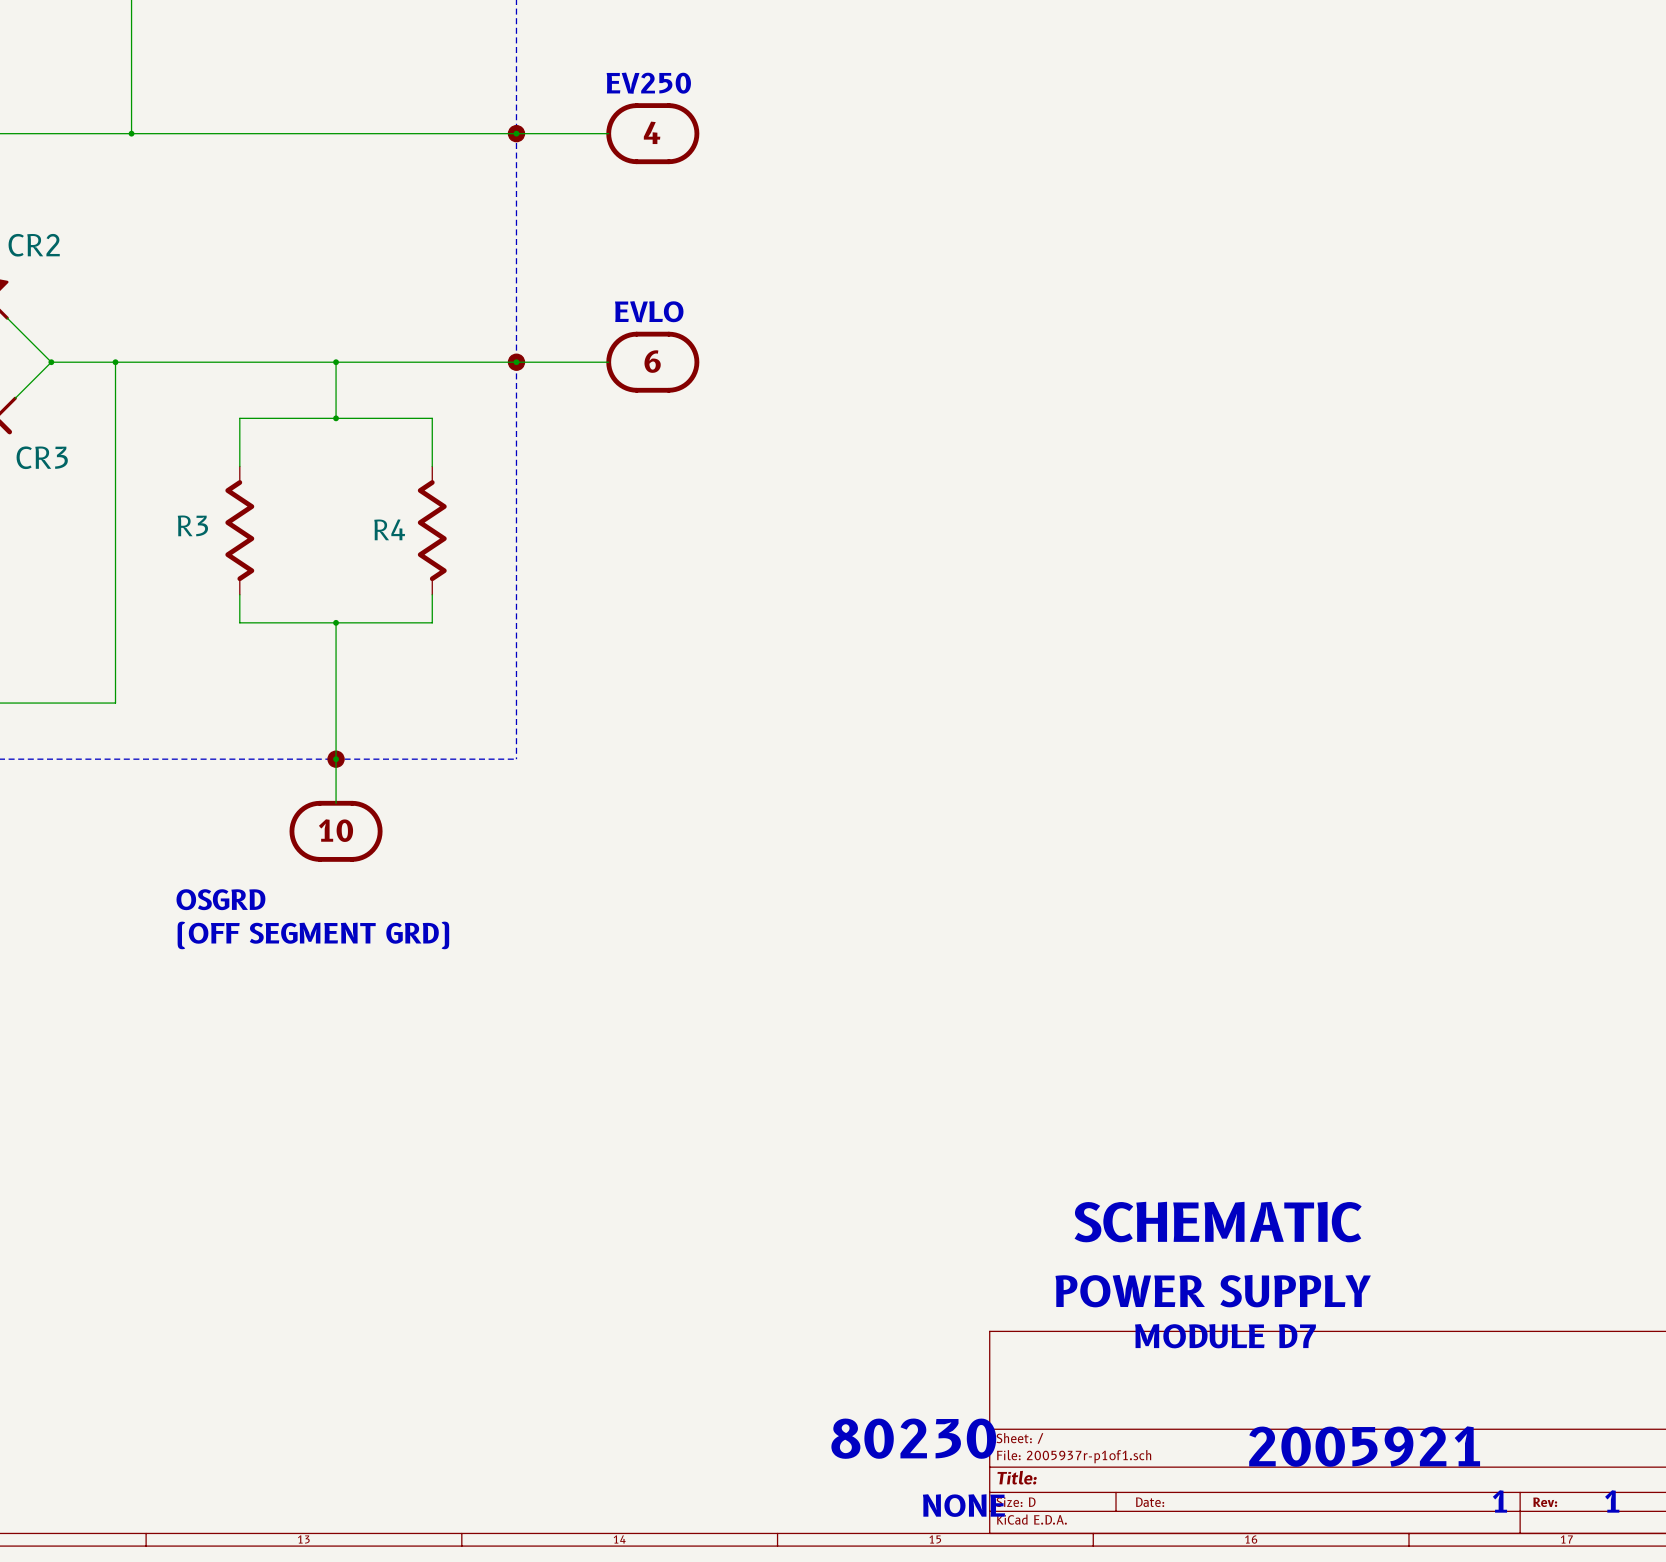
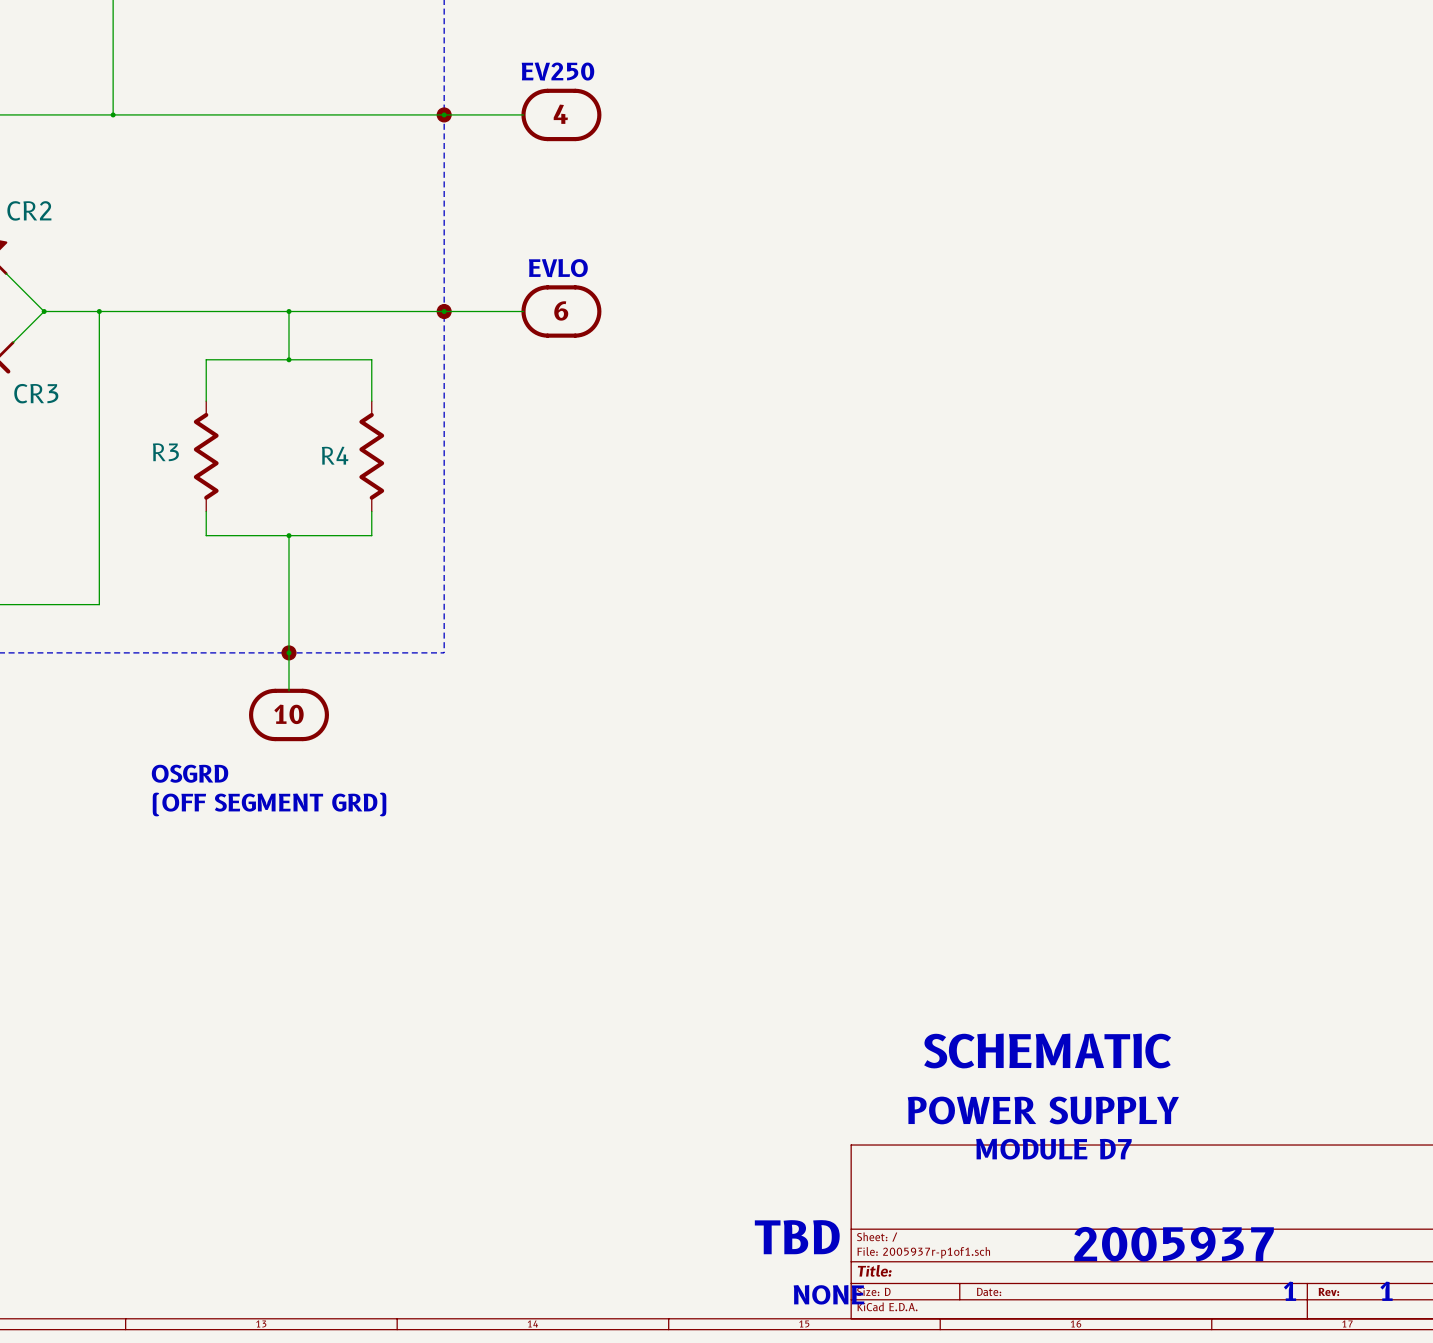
text: 80230 (913, 1438) -> none
text: none -> TBD (797, 1237)
text: 2005921 (1364, 1446) -> 2005937 (1174, 1244)

